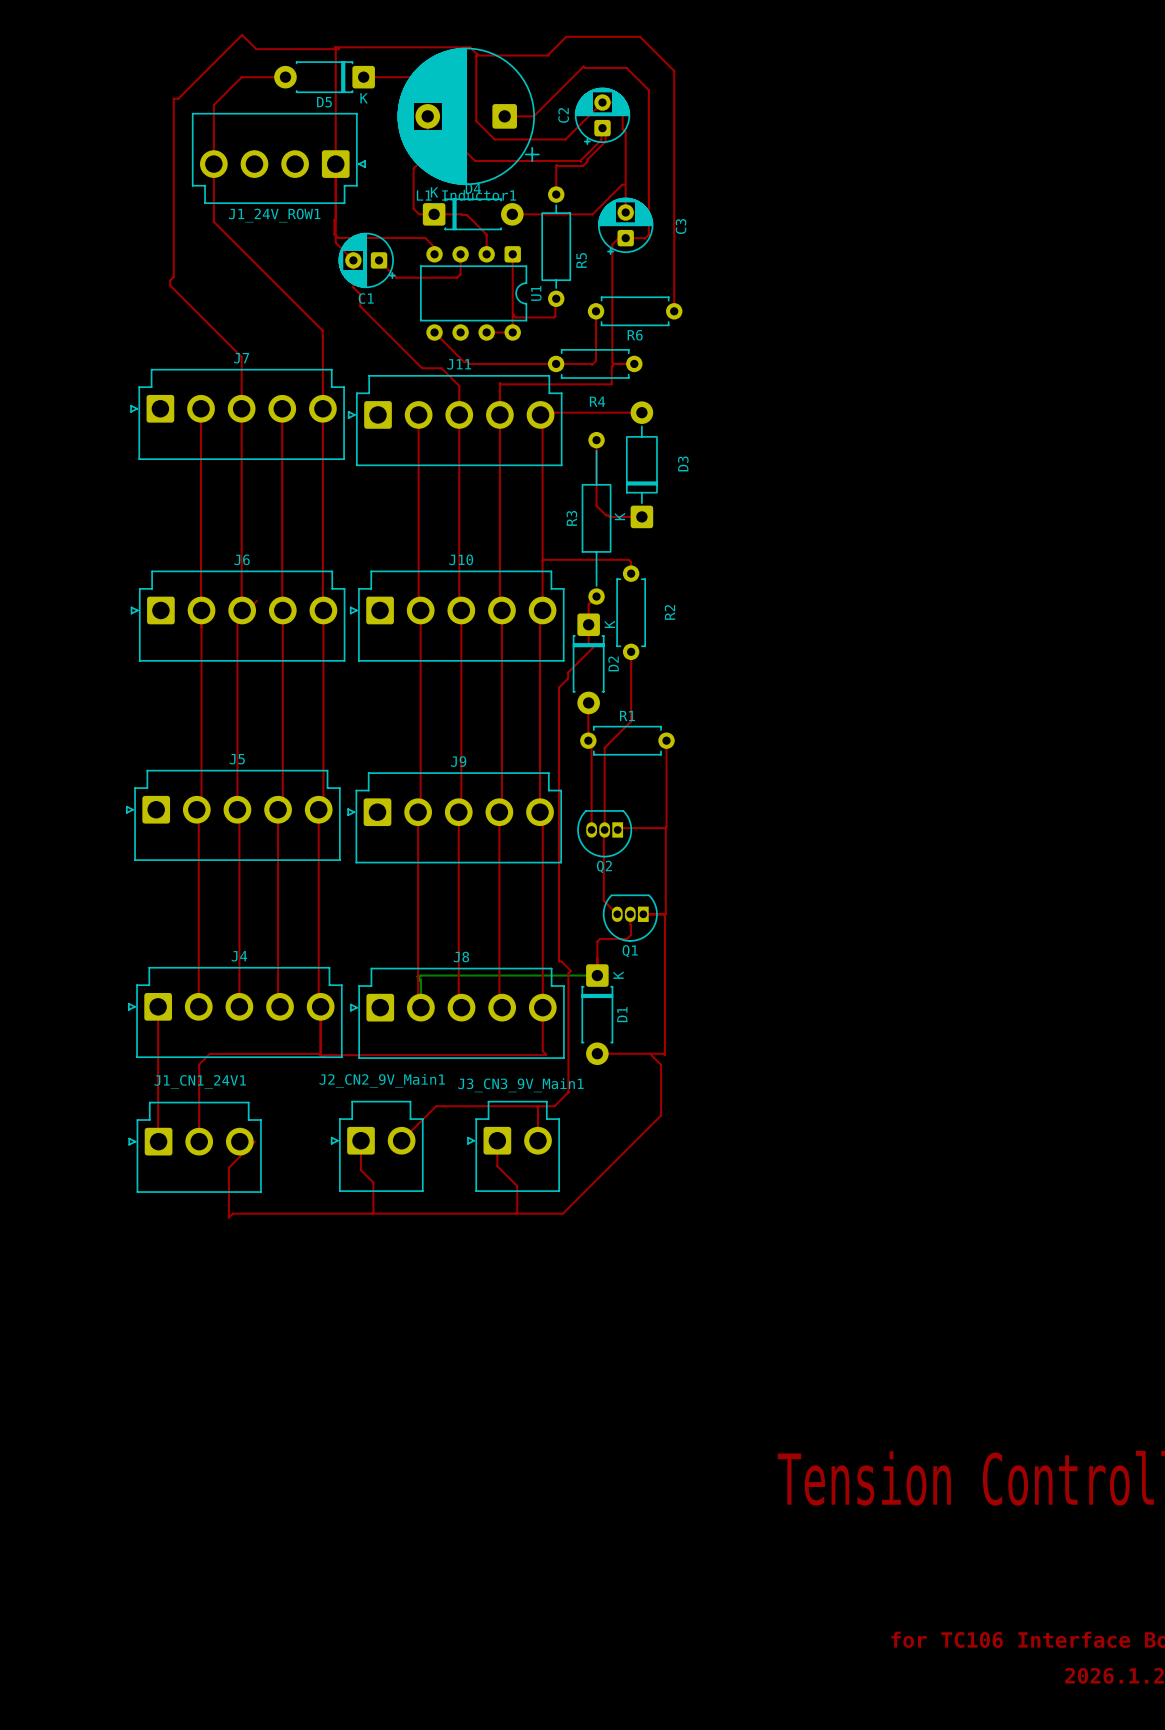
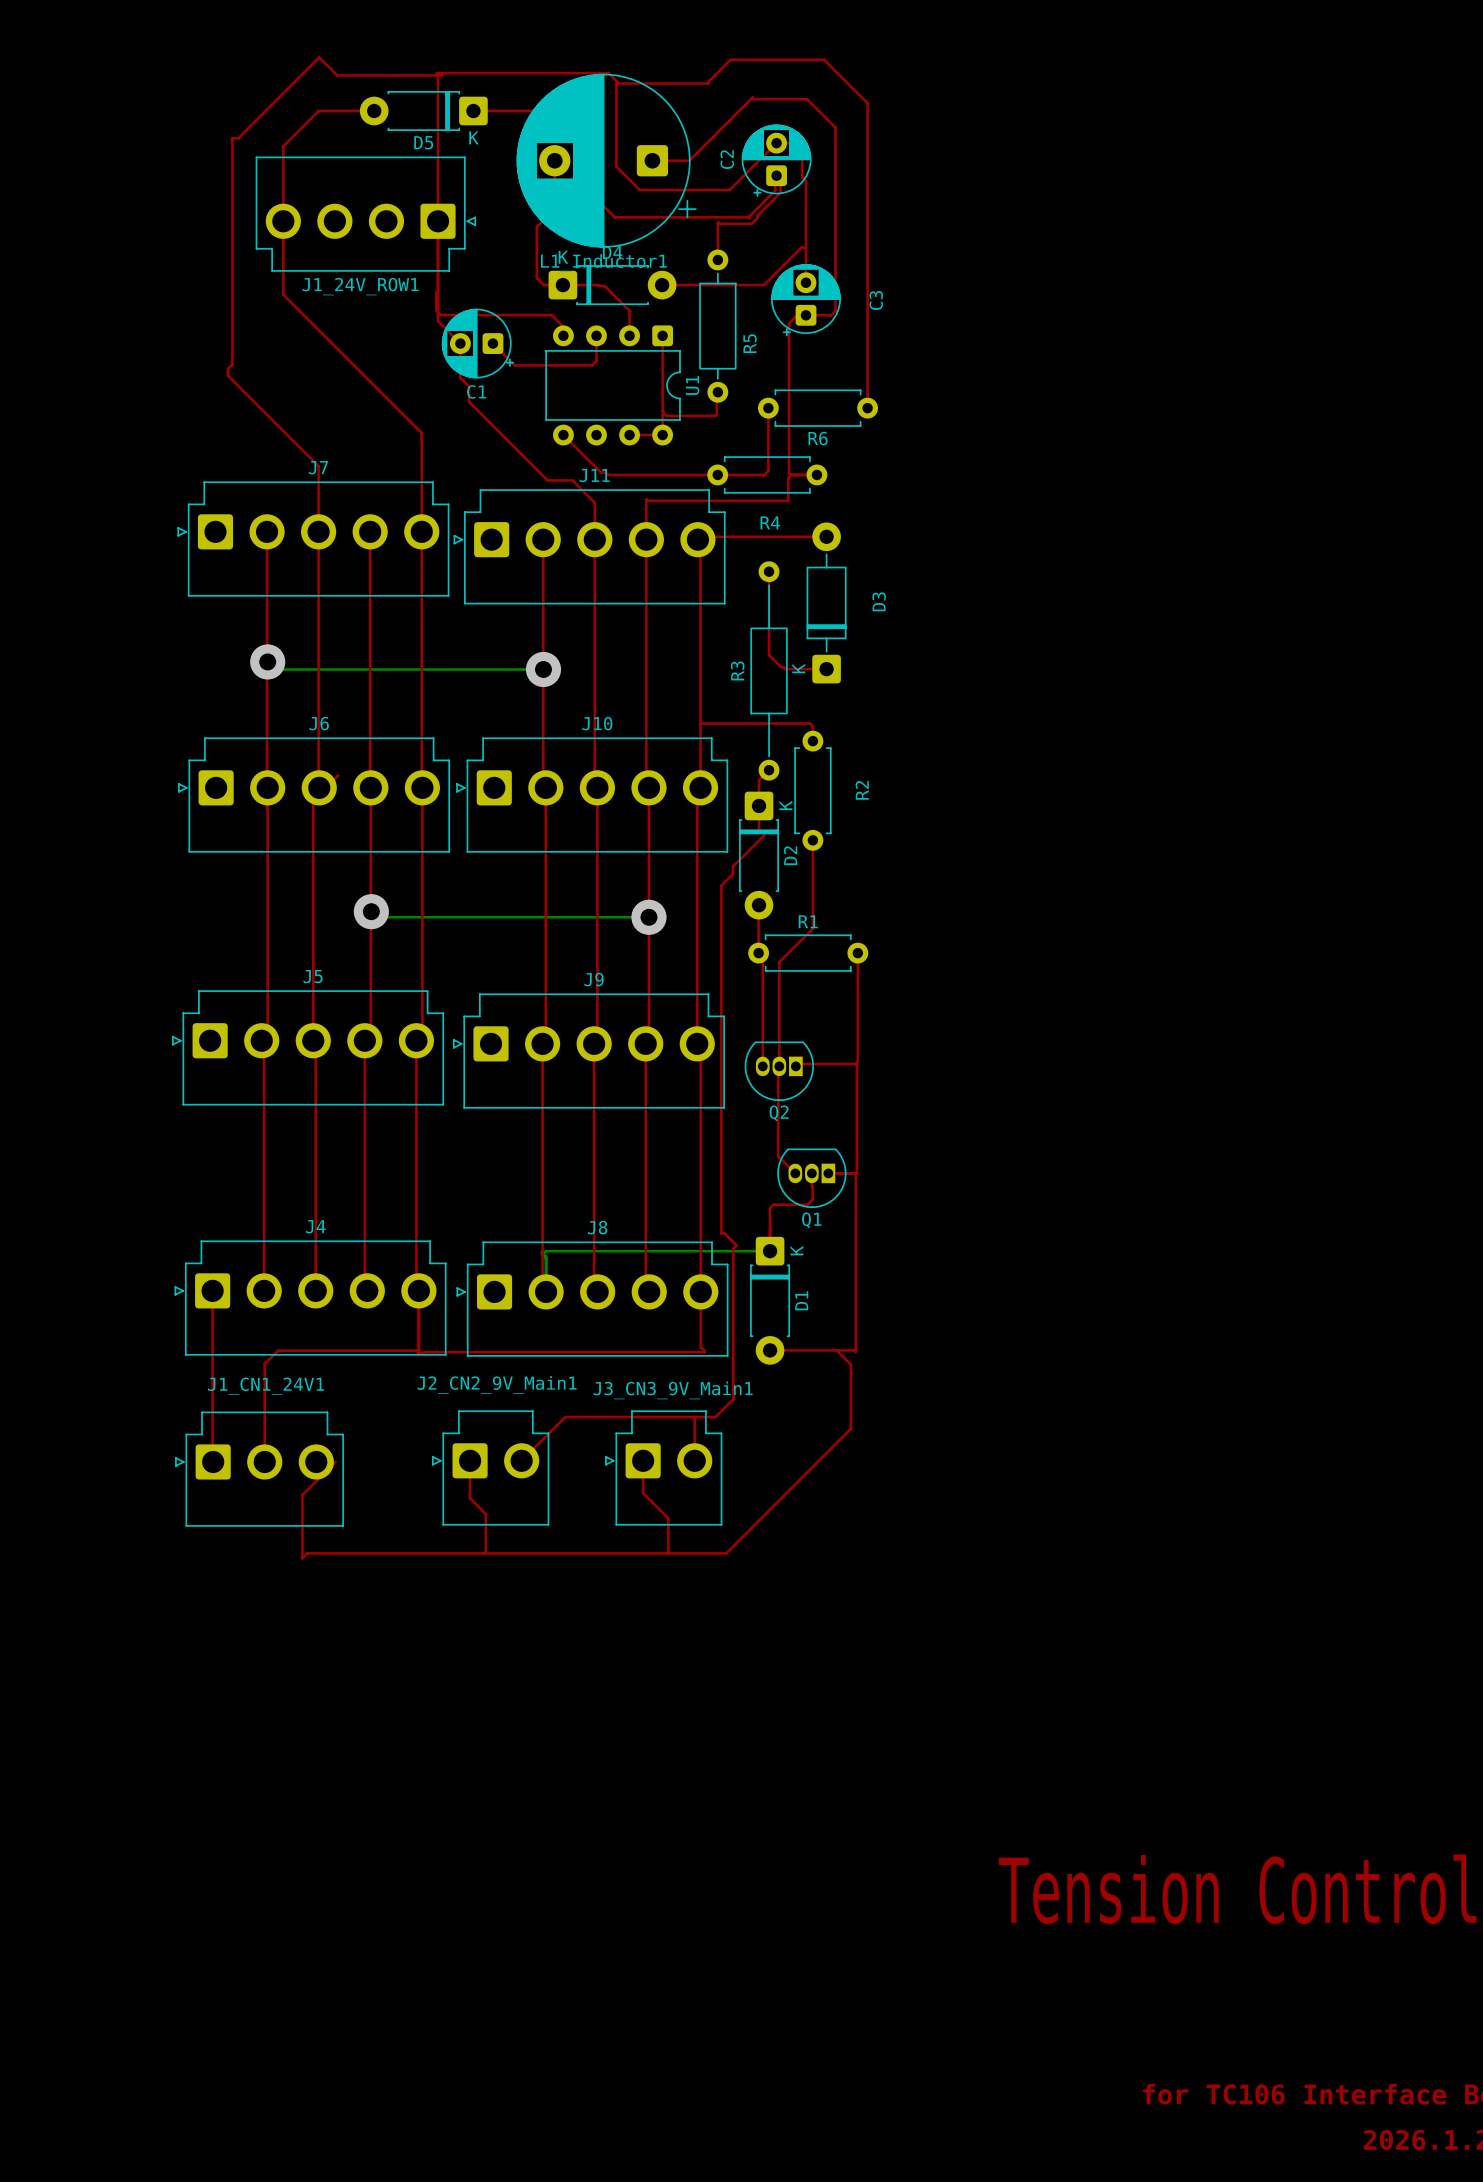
bottom track: none -> (267, 661) (275, 669) (543, 669)
via: none -> (267, 661)
via: none -> (543, 669)
bottom track: none -> (371, 911) (376, 917) (648, 917)
via: none -> (371, 911)
via: none -> (648, 917)

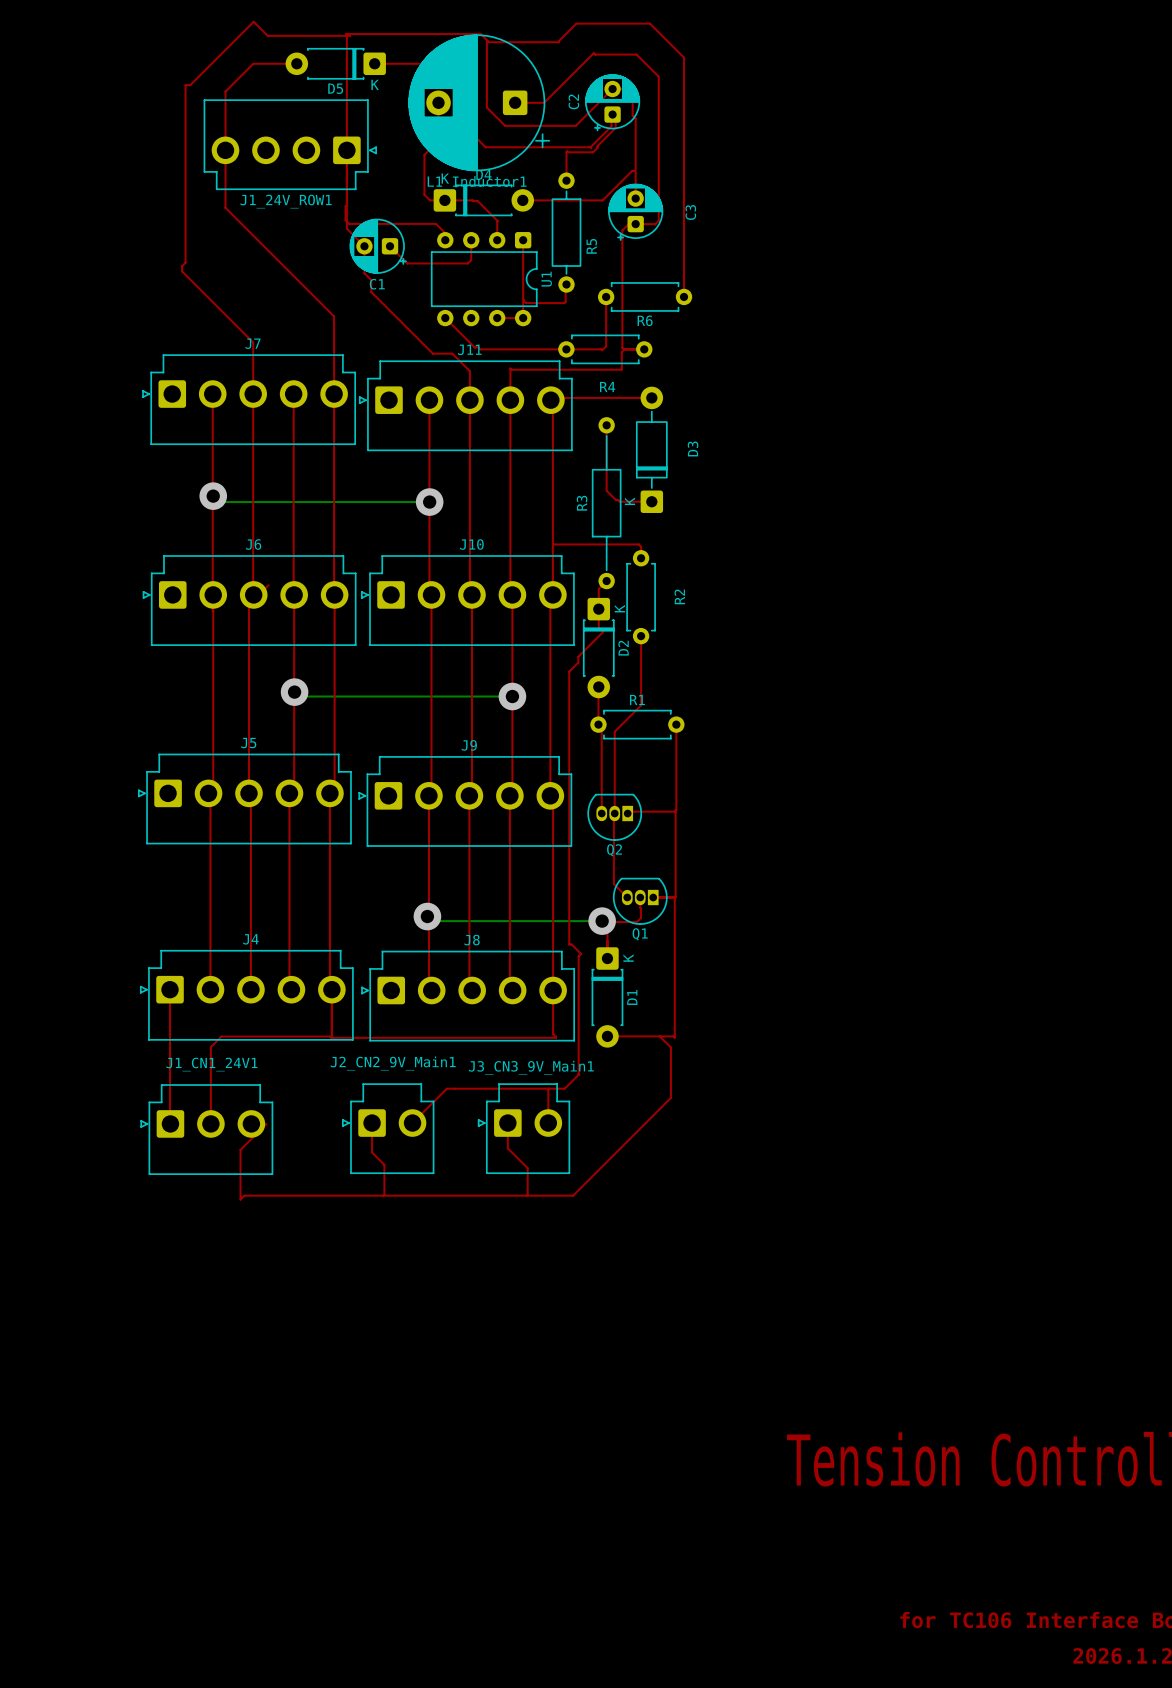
bottom track: none -> (427, 916) (432, 921) (602, 921)
via: none -> (427, 916)
via: none -> (602, 921)
bottom track: (543, 1251) (541, 1252) (546, 1256) (546, 1291) -> none
bottom track: (770, 1251) (545, 1251) (542, 1254) (546, 1258) -> none

